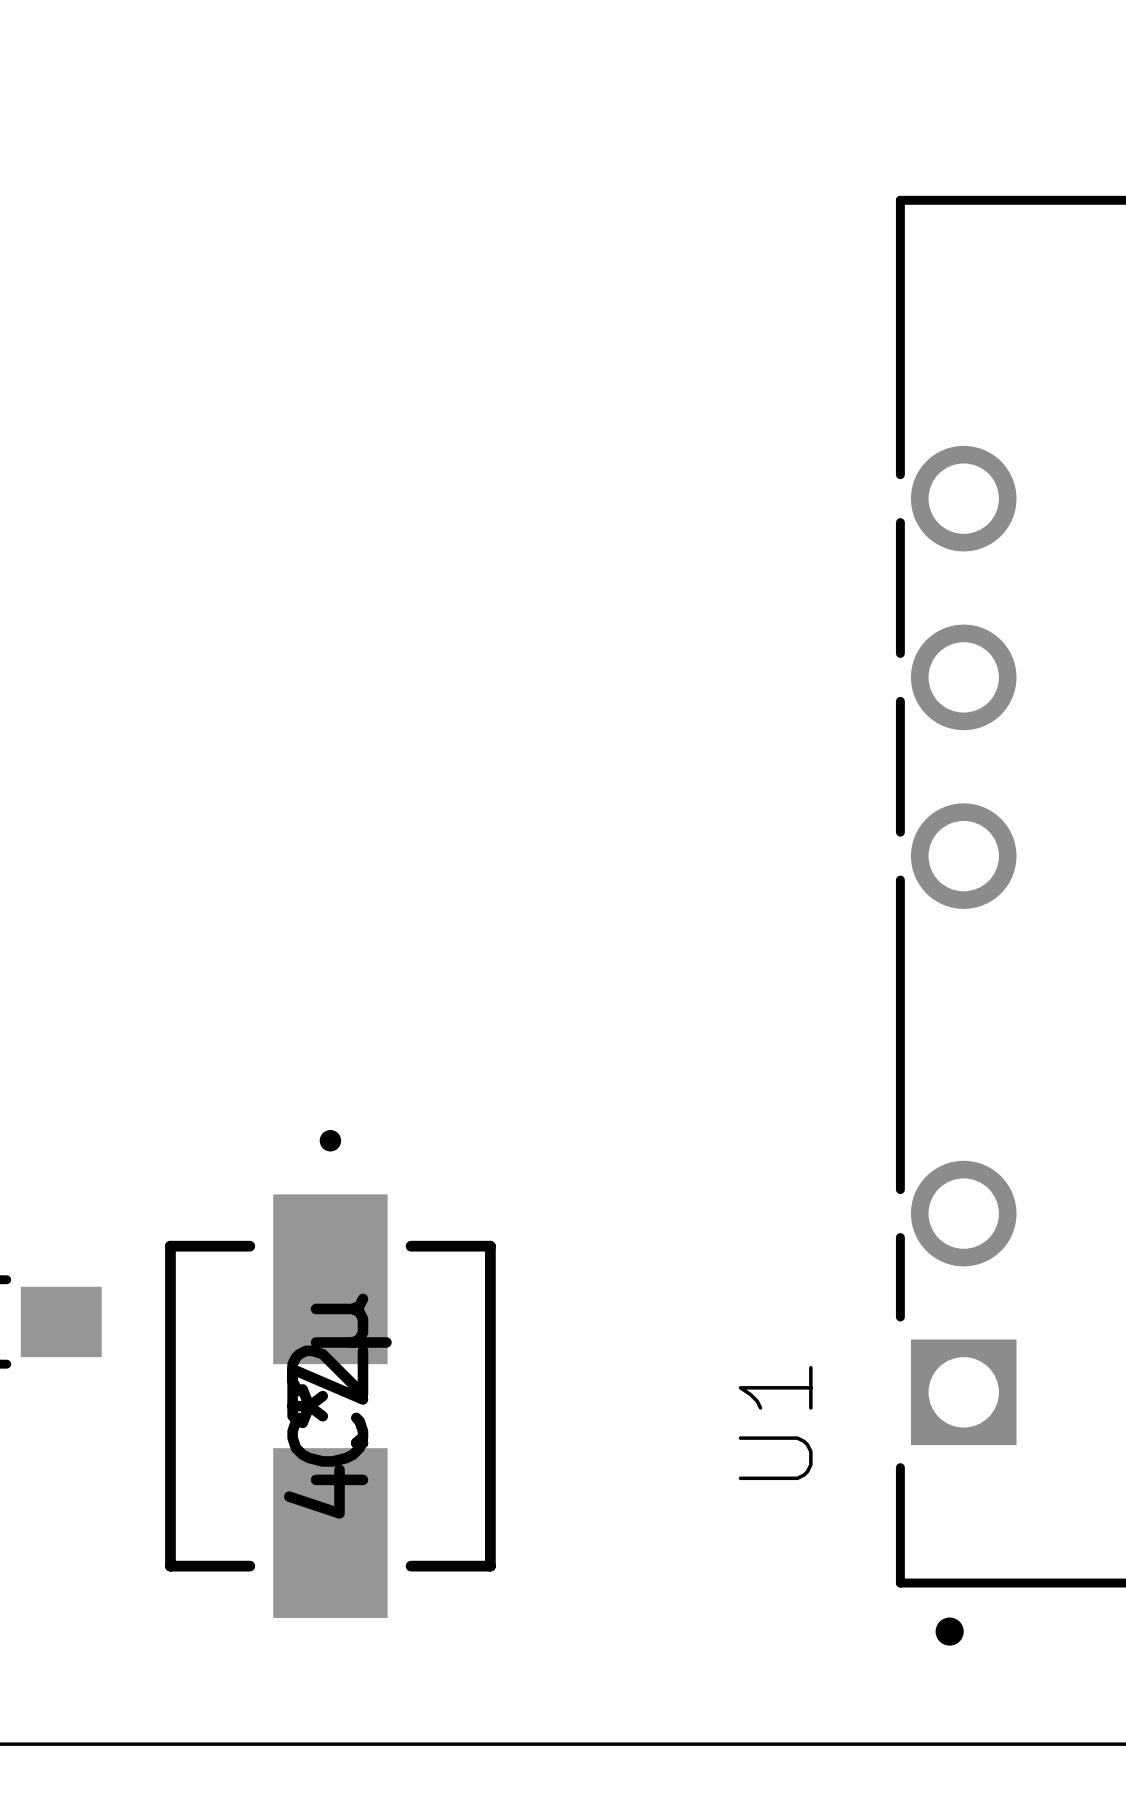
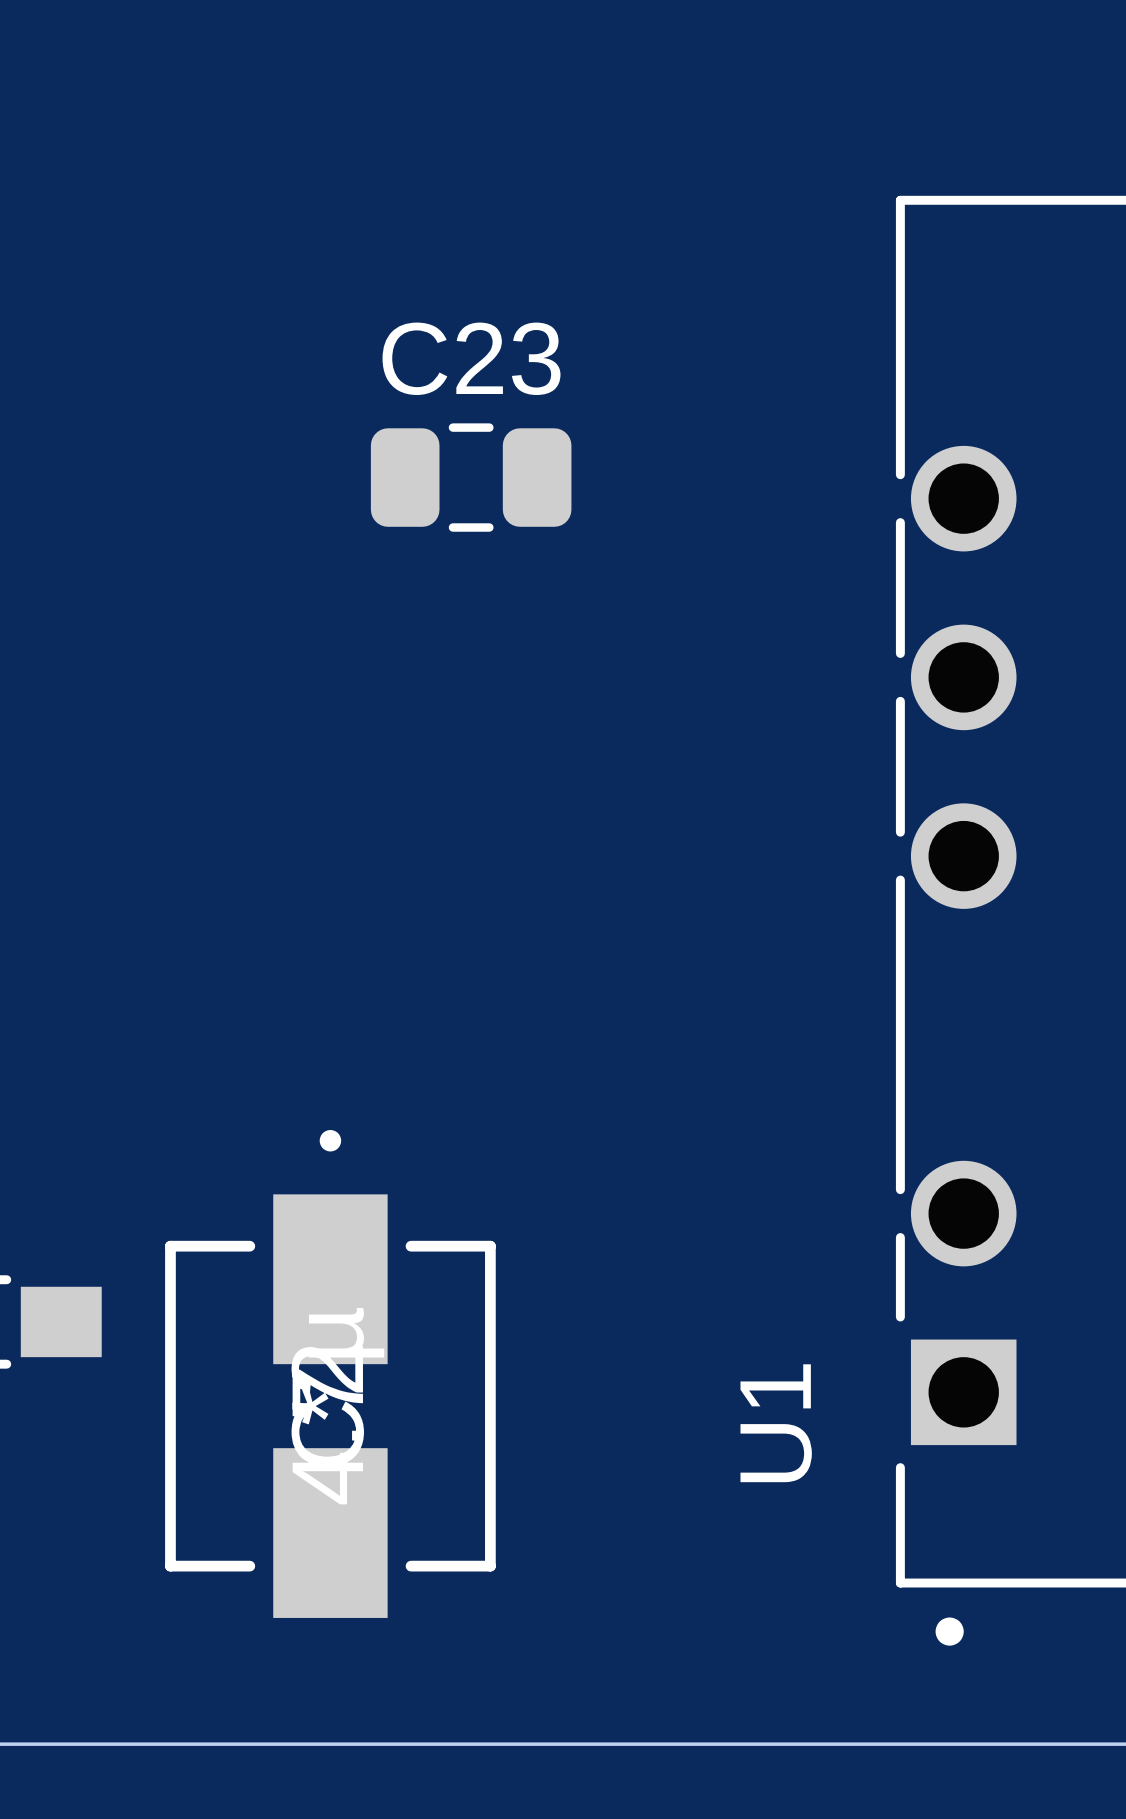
C23: none -> (471, 477)

